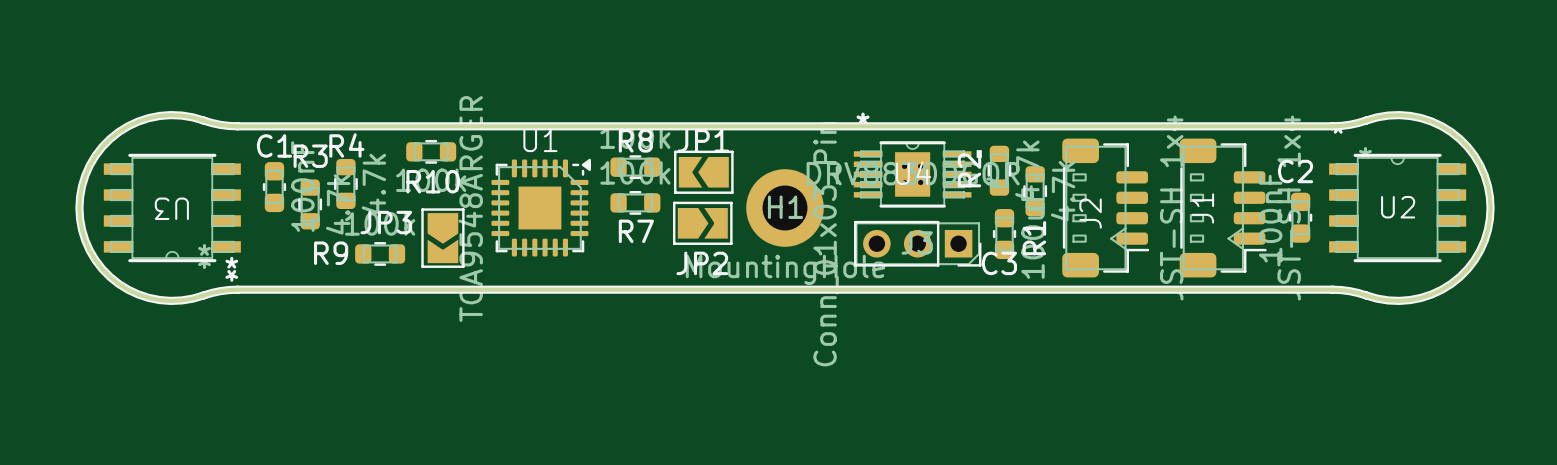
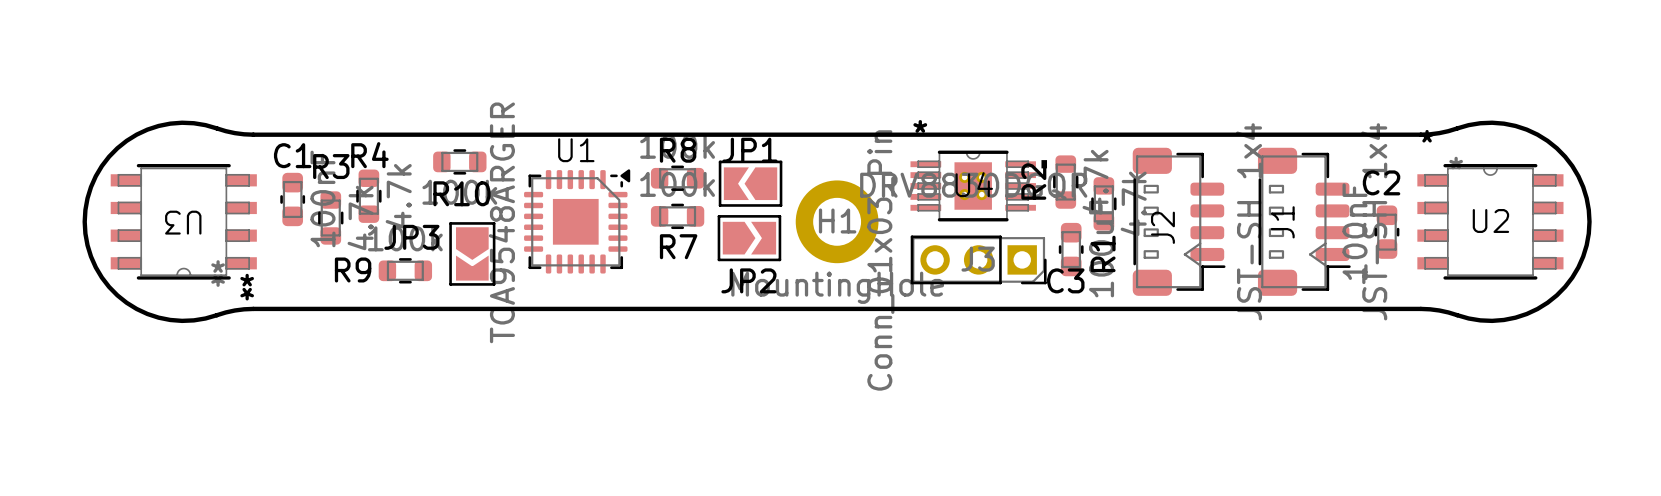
line: (203, 120) (237, 126) (1332, 126) (1399, 115) (1421, 118) (1441, 126) (1467, 146) (1484, 175) (1489, 196) (1489, 219) (1480, 250) (1459, 276) (1431, 294) (1399, 300) (1332, 289) (237, 289) (170, 300) (138, 294) (118, 283) (102, 269) (85, 240) (79, 208) (85, 175) (102, 146) (128, 126) (159, 115) (181, 115) (203, 120) -> none

